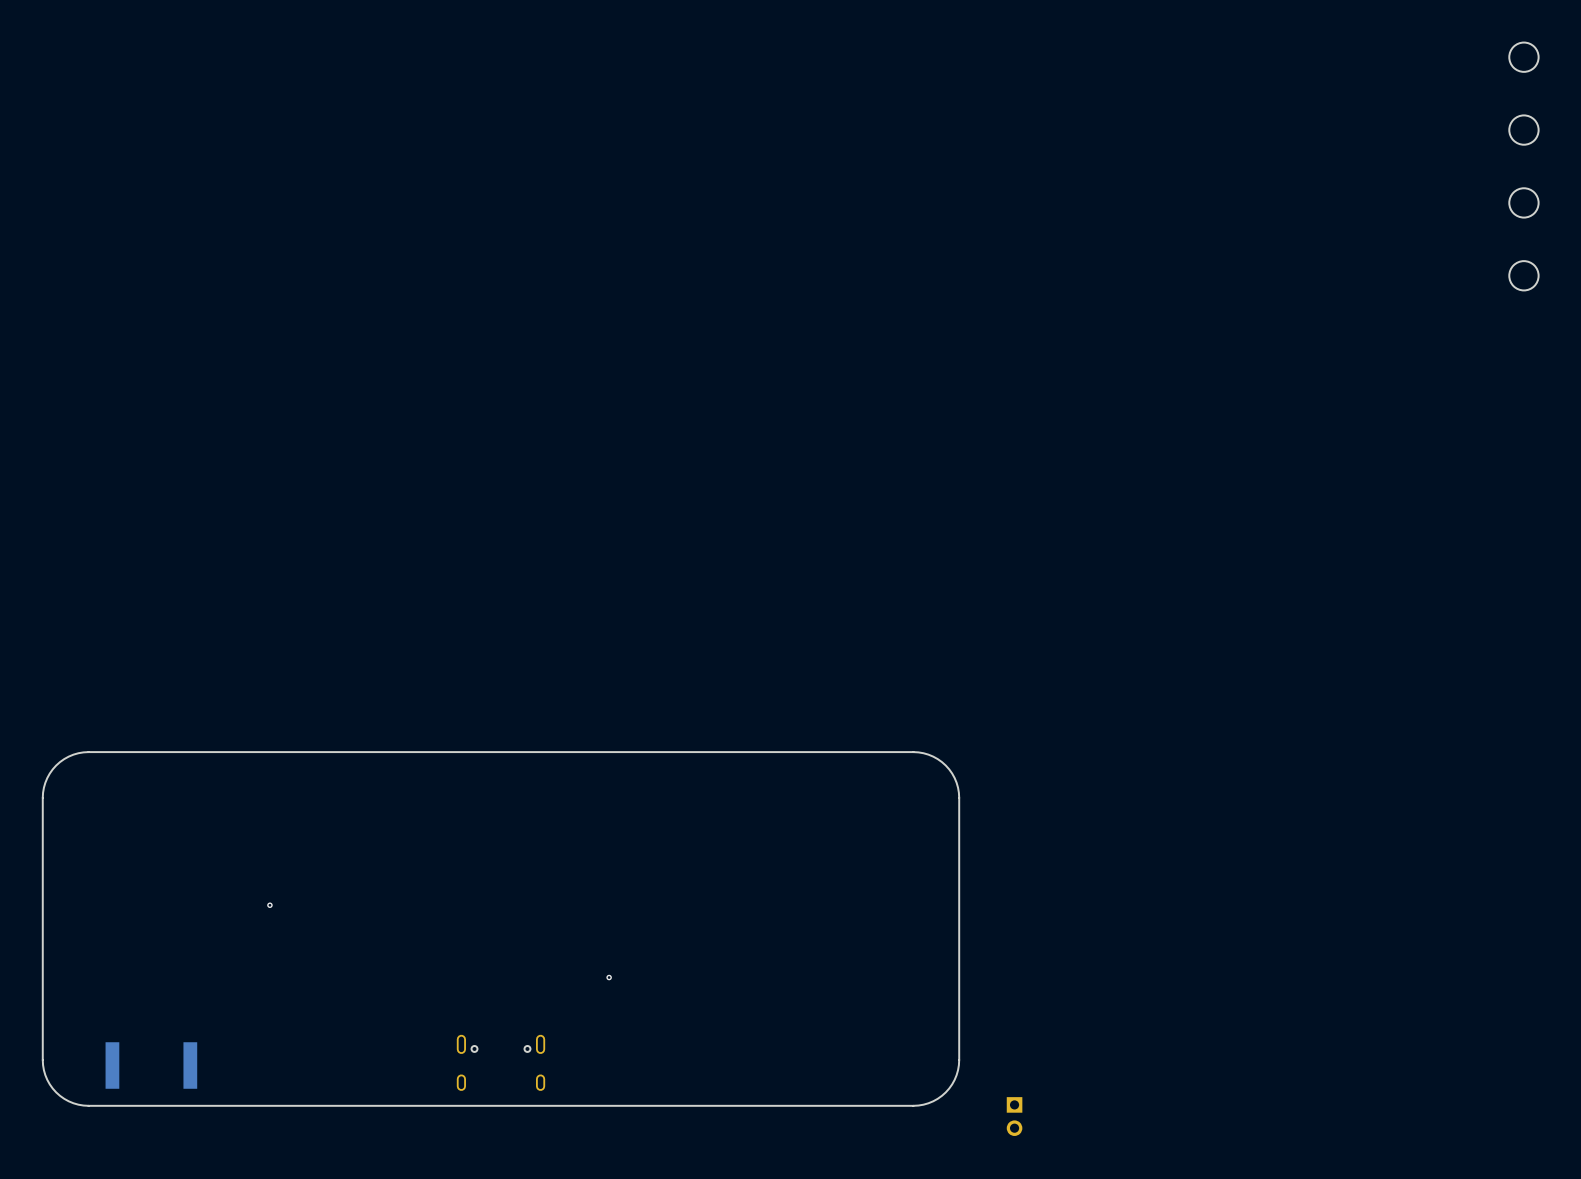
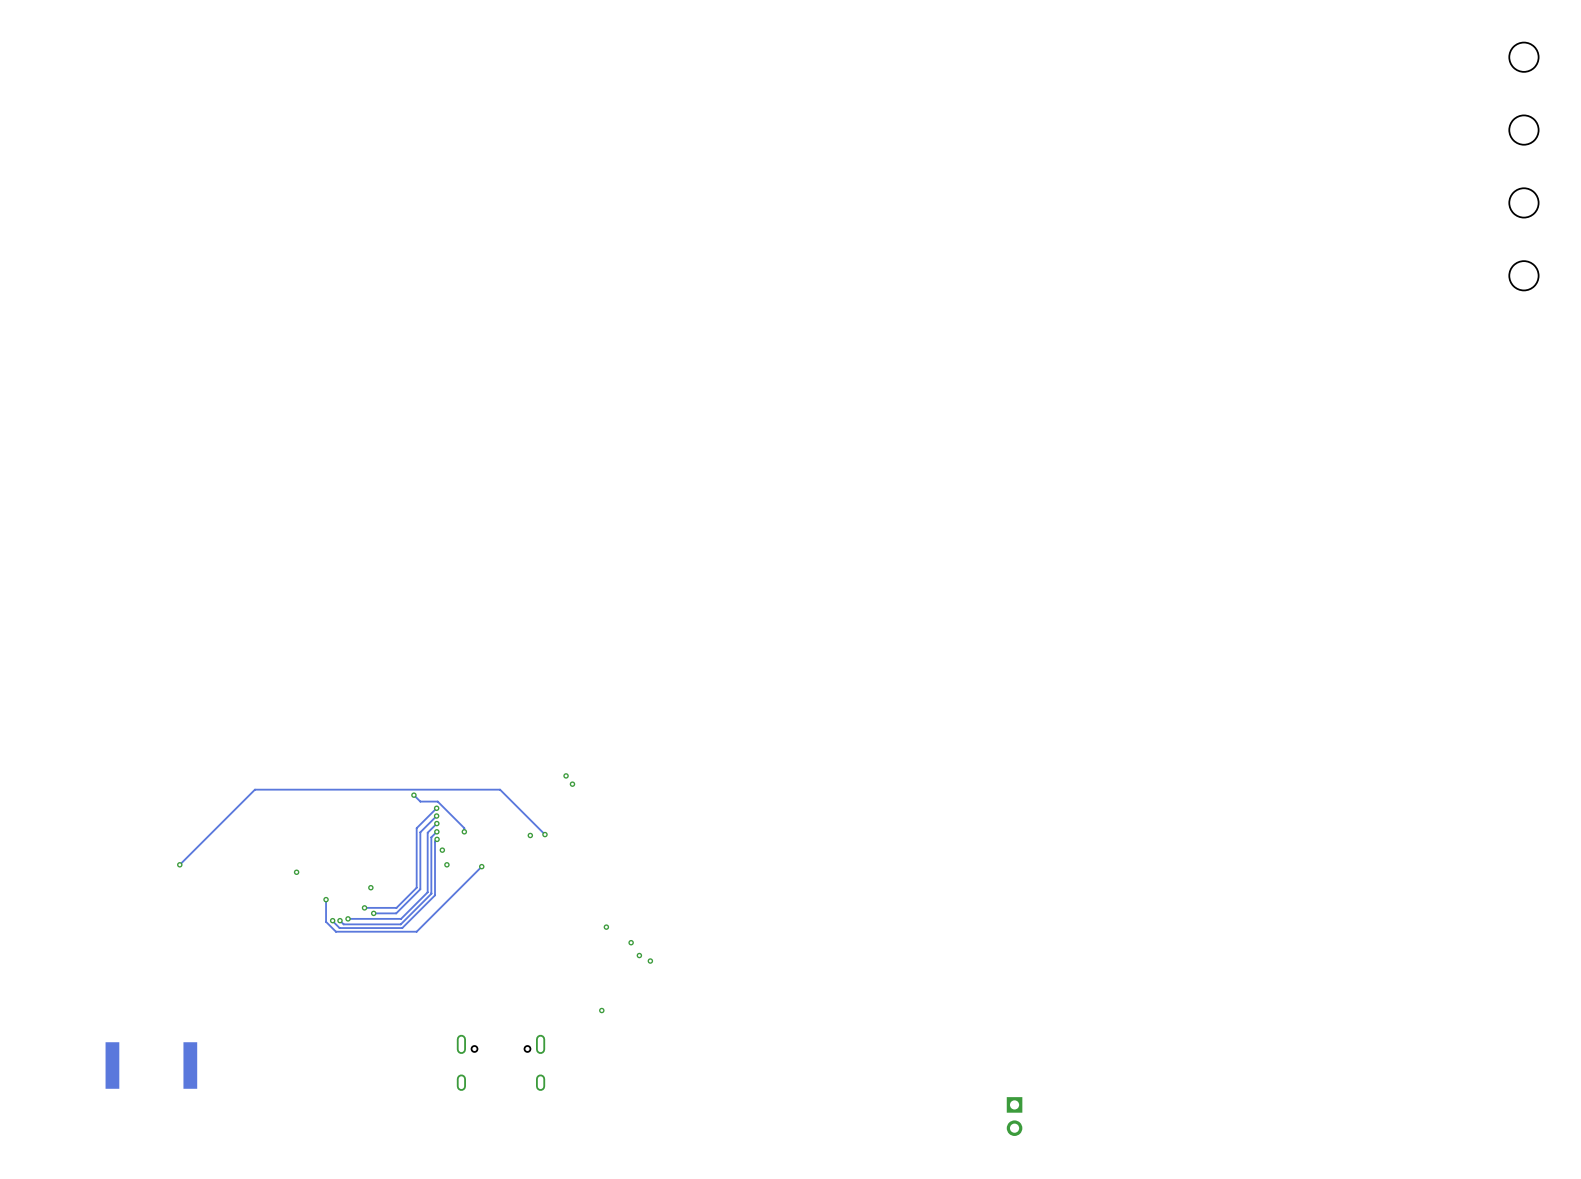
board edge: (913, 752) (88, 752) (73, 754) (60, 762) (52, 769) (45, 782) (43, 792) (42, 1060) (45, 1075) (52, 1088) (64, 1098) (78, 1104) (88, 1105) (913, 1105) (928, 1103) (941, 1095) (949, 1088) (956, 1075) (958, 1065) (959, 797) (956, 782) (945, 765) (928, 754) (913, 752) -> none
via: none -> (566, 775)
via: none -> (572, 784)
track: none -> (413, 795) (420, 801) (437, 801) (464, 828) (464, 831)
via: none -> (413, 795)
track: none -> (436, 808) (416, 828) (416, 887) (396, 907) (364, 907)
via: none -> (436, 808)
track: none -> (436, 816) (420, 832) (420, 889) (396, 913) (373, 913)
via: none -> (436, 816)
track: none -> (436, 823) (427, 832) (427, 892) (401, 918) (348, 918)
via: none -> (436, 823)
track: none -> (436, 831) (431, 837) (431, 893) (400, 924) (343, 924) (339, 920)
via: none -> (436, 831)
via: none -> (464, 831)
track: none -> (544, 834) (500, 789) (254, 789) (179, 864)
via: none -> (544, 834)
via: none -> (530, 835)
track: none -> (437, 839) (435, 841) (435, 895) (402, 928) (339, 928) (332, 920)
via: none -> (437, 839)
via: none -> (442, 850)
via: none -> (179, 864)
via: none -> (446, 864)
track: none -> (481, 866) (416, 931) (335, 931) (326, 921) (326, 899)
via: none -> (481, 866)
via: none -> (296, 872)
via: none -> (370, 887)
via: none -> (326, 899)
via: (269, 905) -> none
via: none -> (364, 907)
via: none -> (373, 913)
via: none -> (348, 918)
via: none -> (332, 920)
via: none -> (339, 920)
via: none -> (606, 927)
via: none -> (631, 942)
via: none -> (639, 955)
via: none -> (650, 961)
via: (609, 977) -> none
via: none -> (601, 1010)

